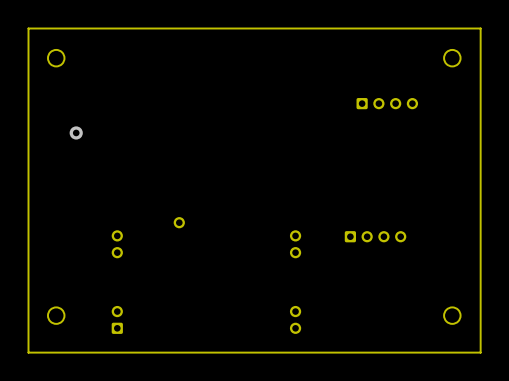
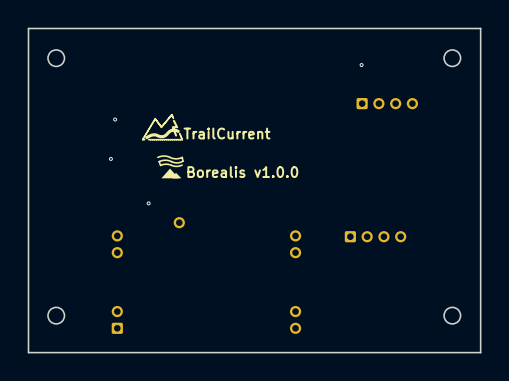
via: none -> (361, 65)
drawing: none -> [142, 114, 183, 141]
via: none -> (115, 119)
via: (76, 132) -> none
text: none -> TrailCurrent (226, 133)
line: none -> (157, 157) (182, 157) (182, 161) (178, 162) (166, 160) (159, 161) (160, 165) (182, 165)
via: none -> (110, 158)
drawing: none -> [161, 168, 182, 179]
text: none -> Borealis v1.0.0 (242, 172)
via: none -> (148, 203)

